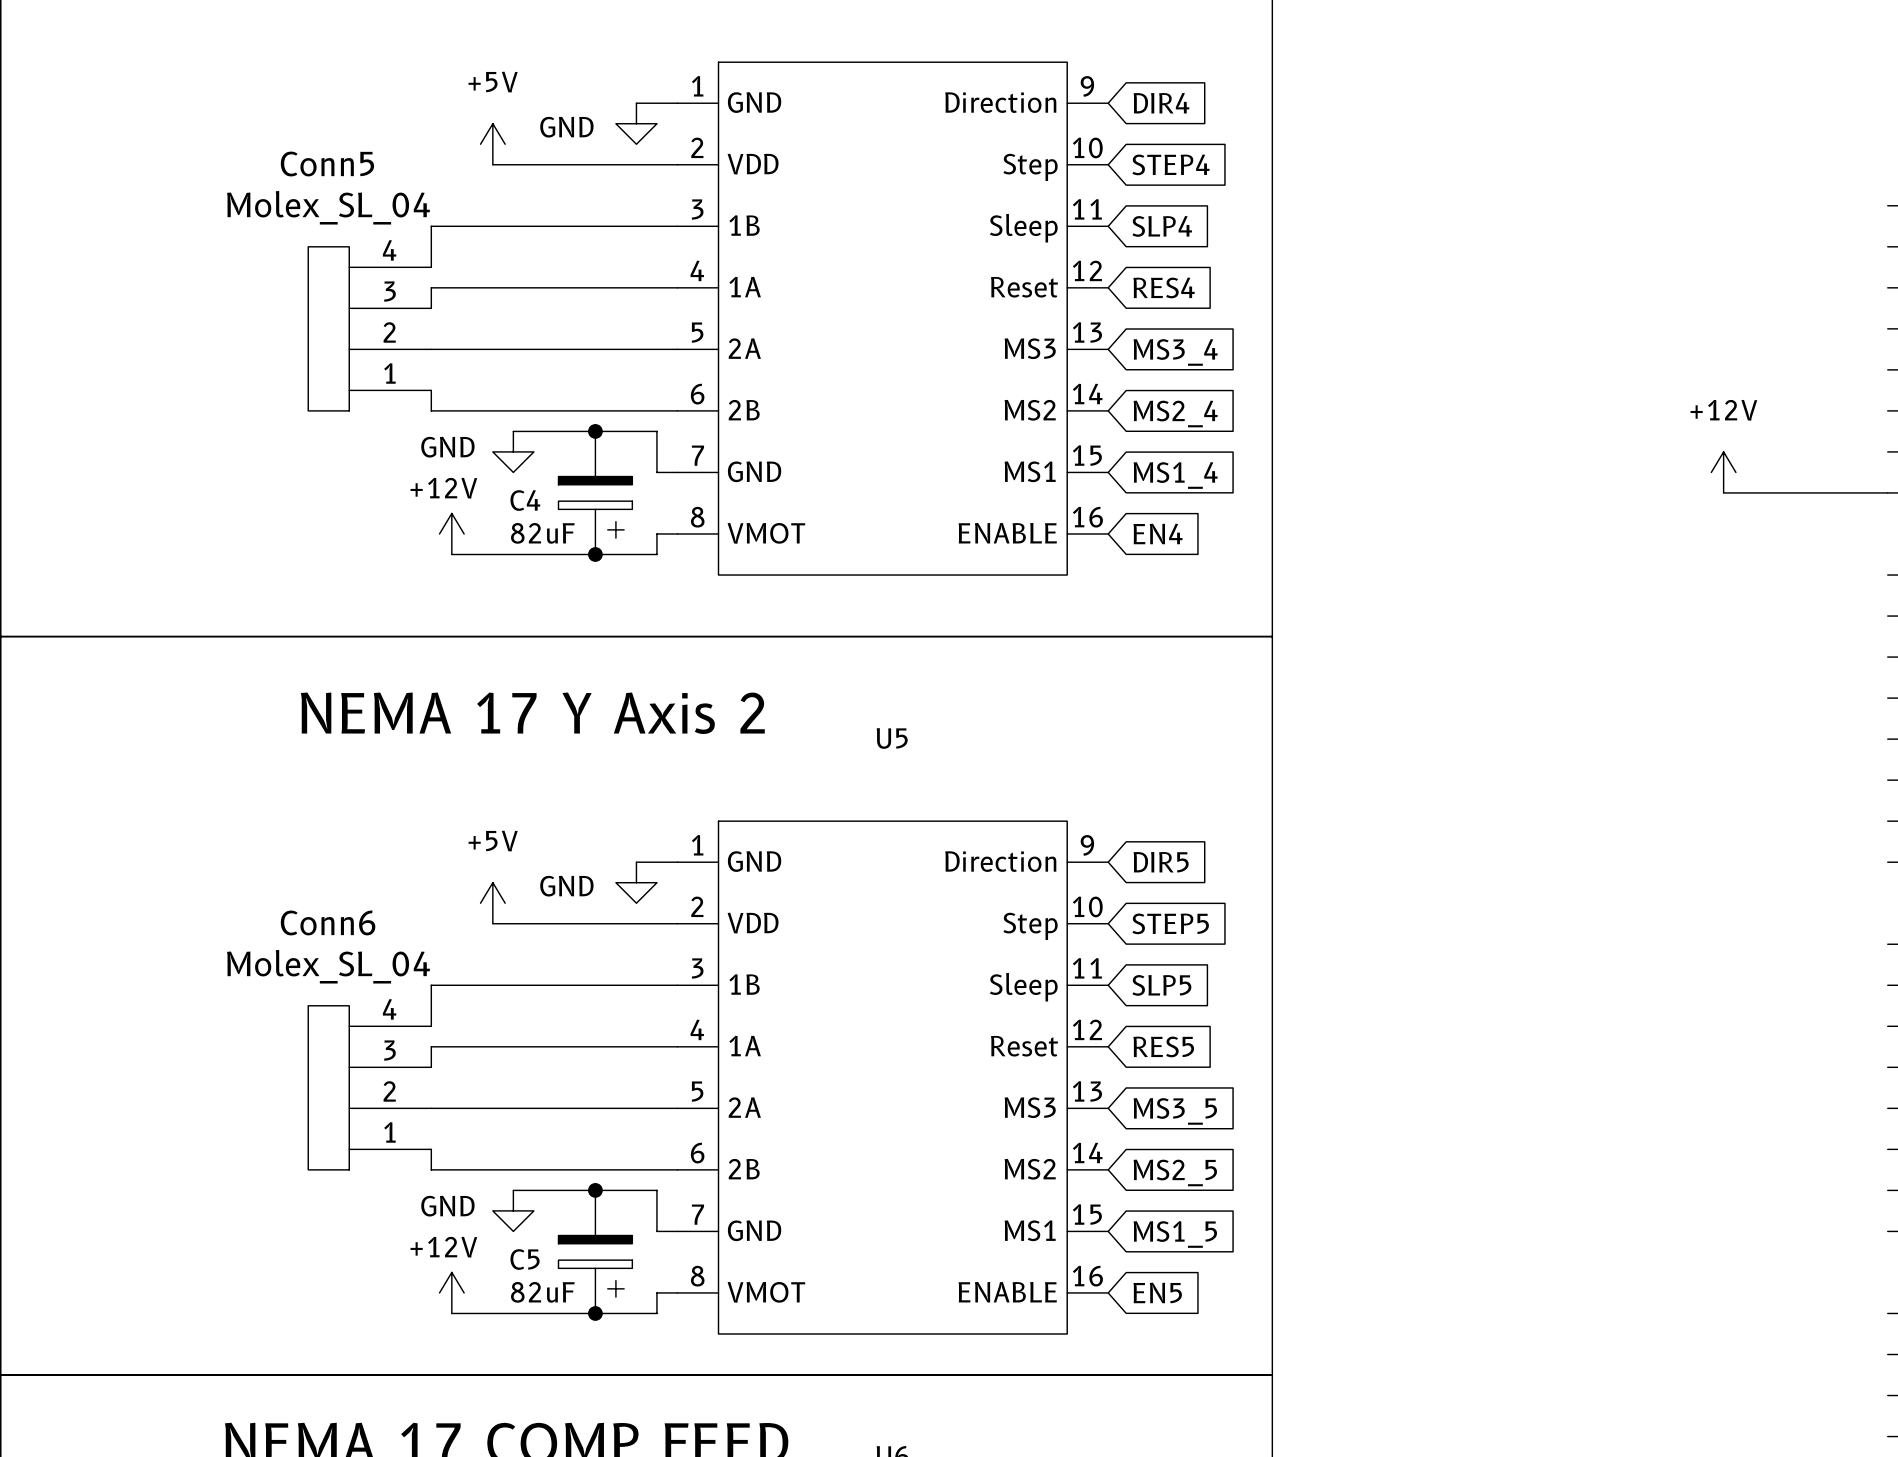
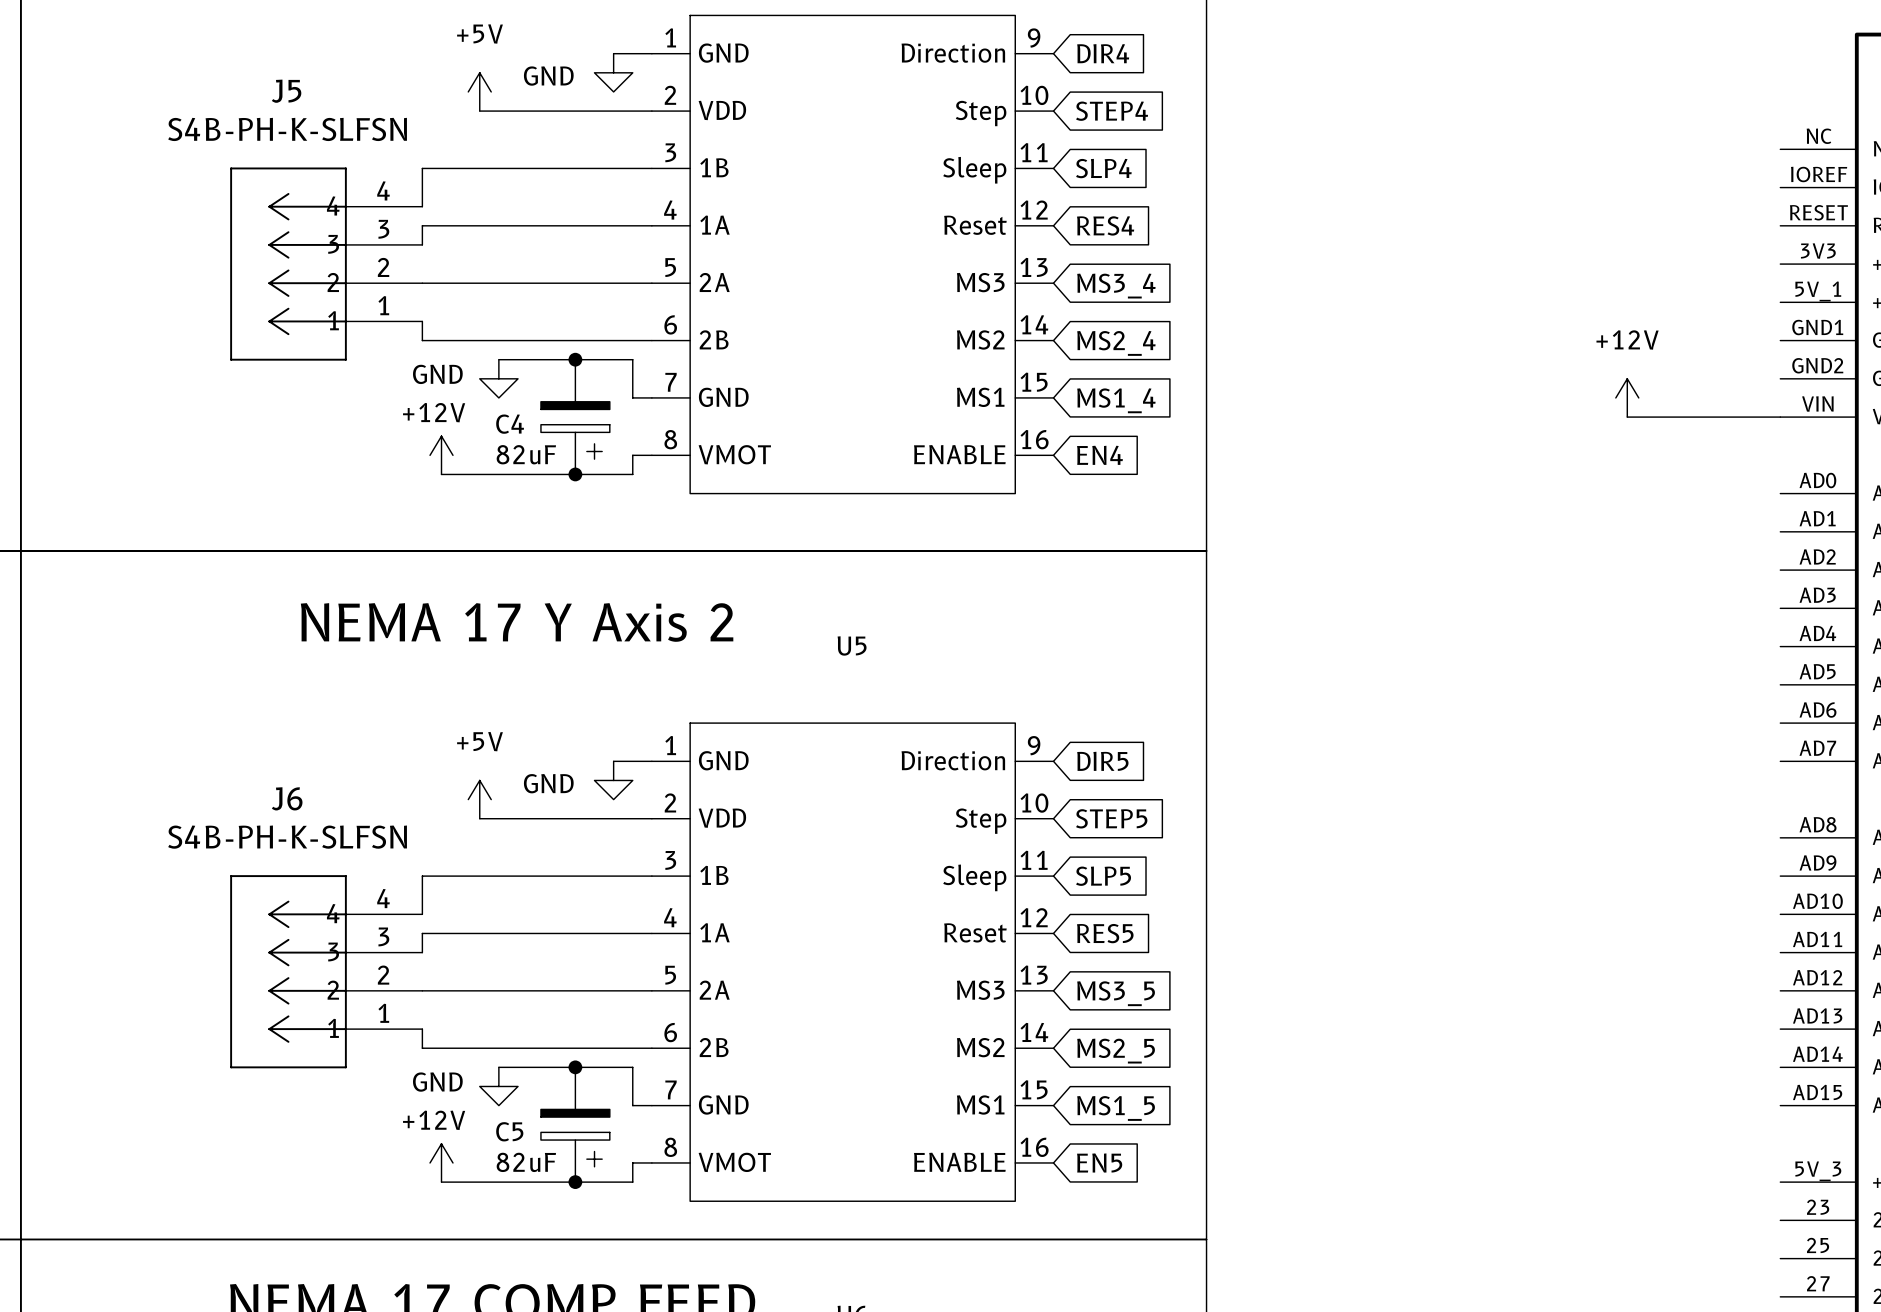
J5: none -> S4B-PH-K-SLFSN (326, 264)
Conn5: Molex_SL_04 (369, 328) -> none
J6: none -> S4B-PH-K-SLFSN (326, 971)
Conn6: Molex_SL_04 (369, 1087) -> none

